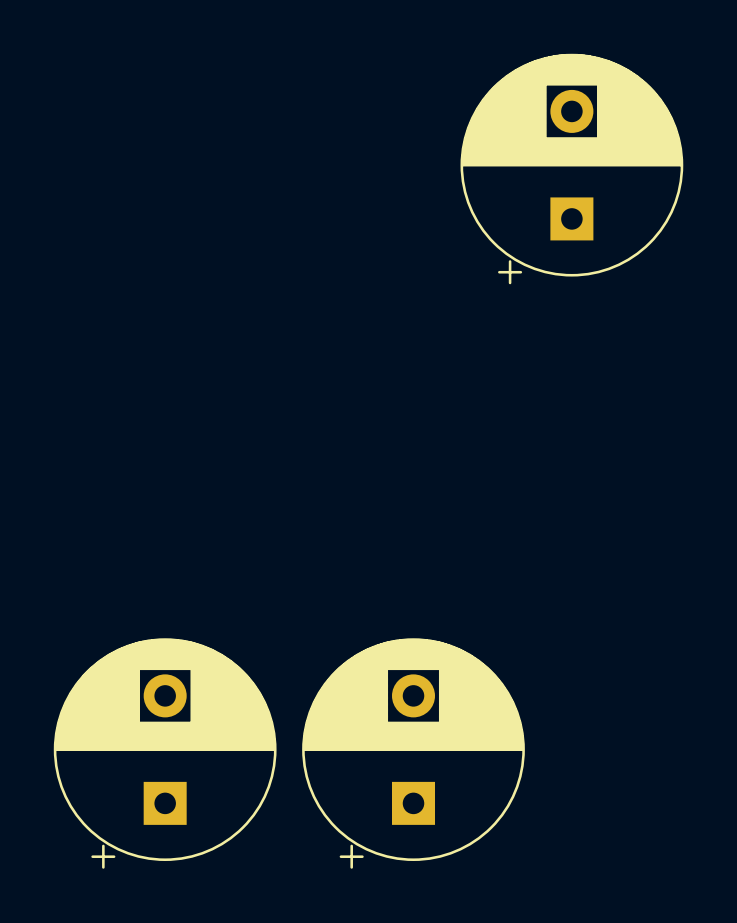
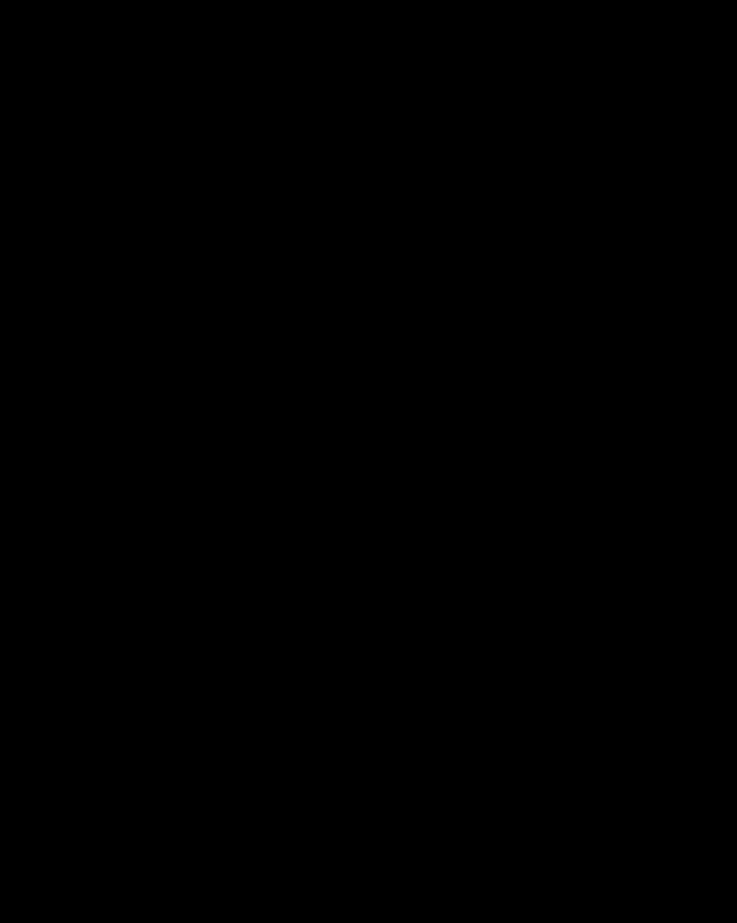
part: (571, 169) -> none
part: (165, 753) -> none
part: (413, 753) -> none

